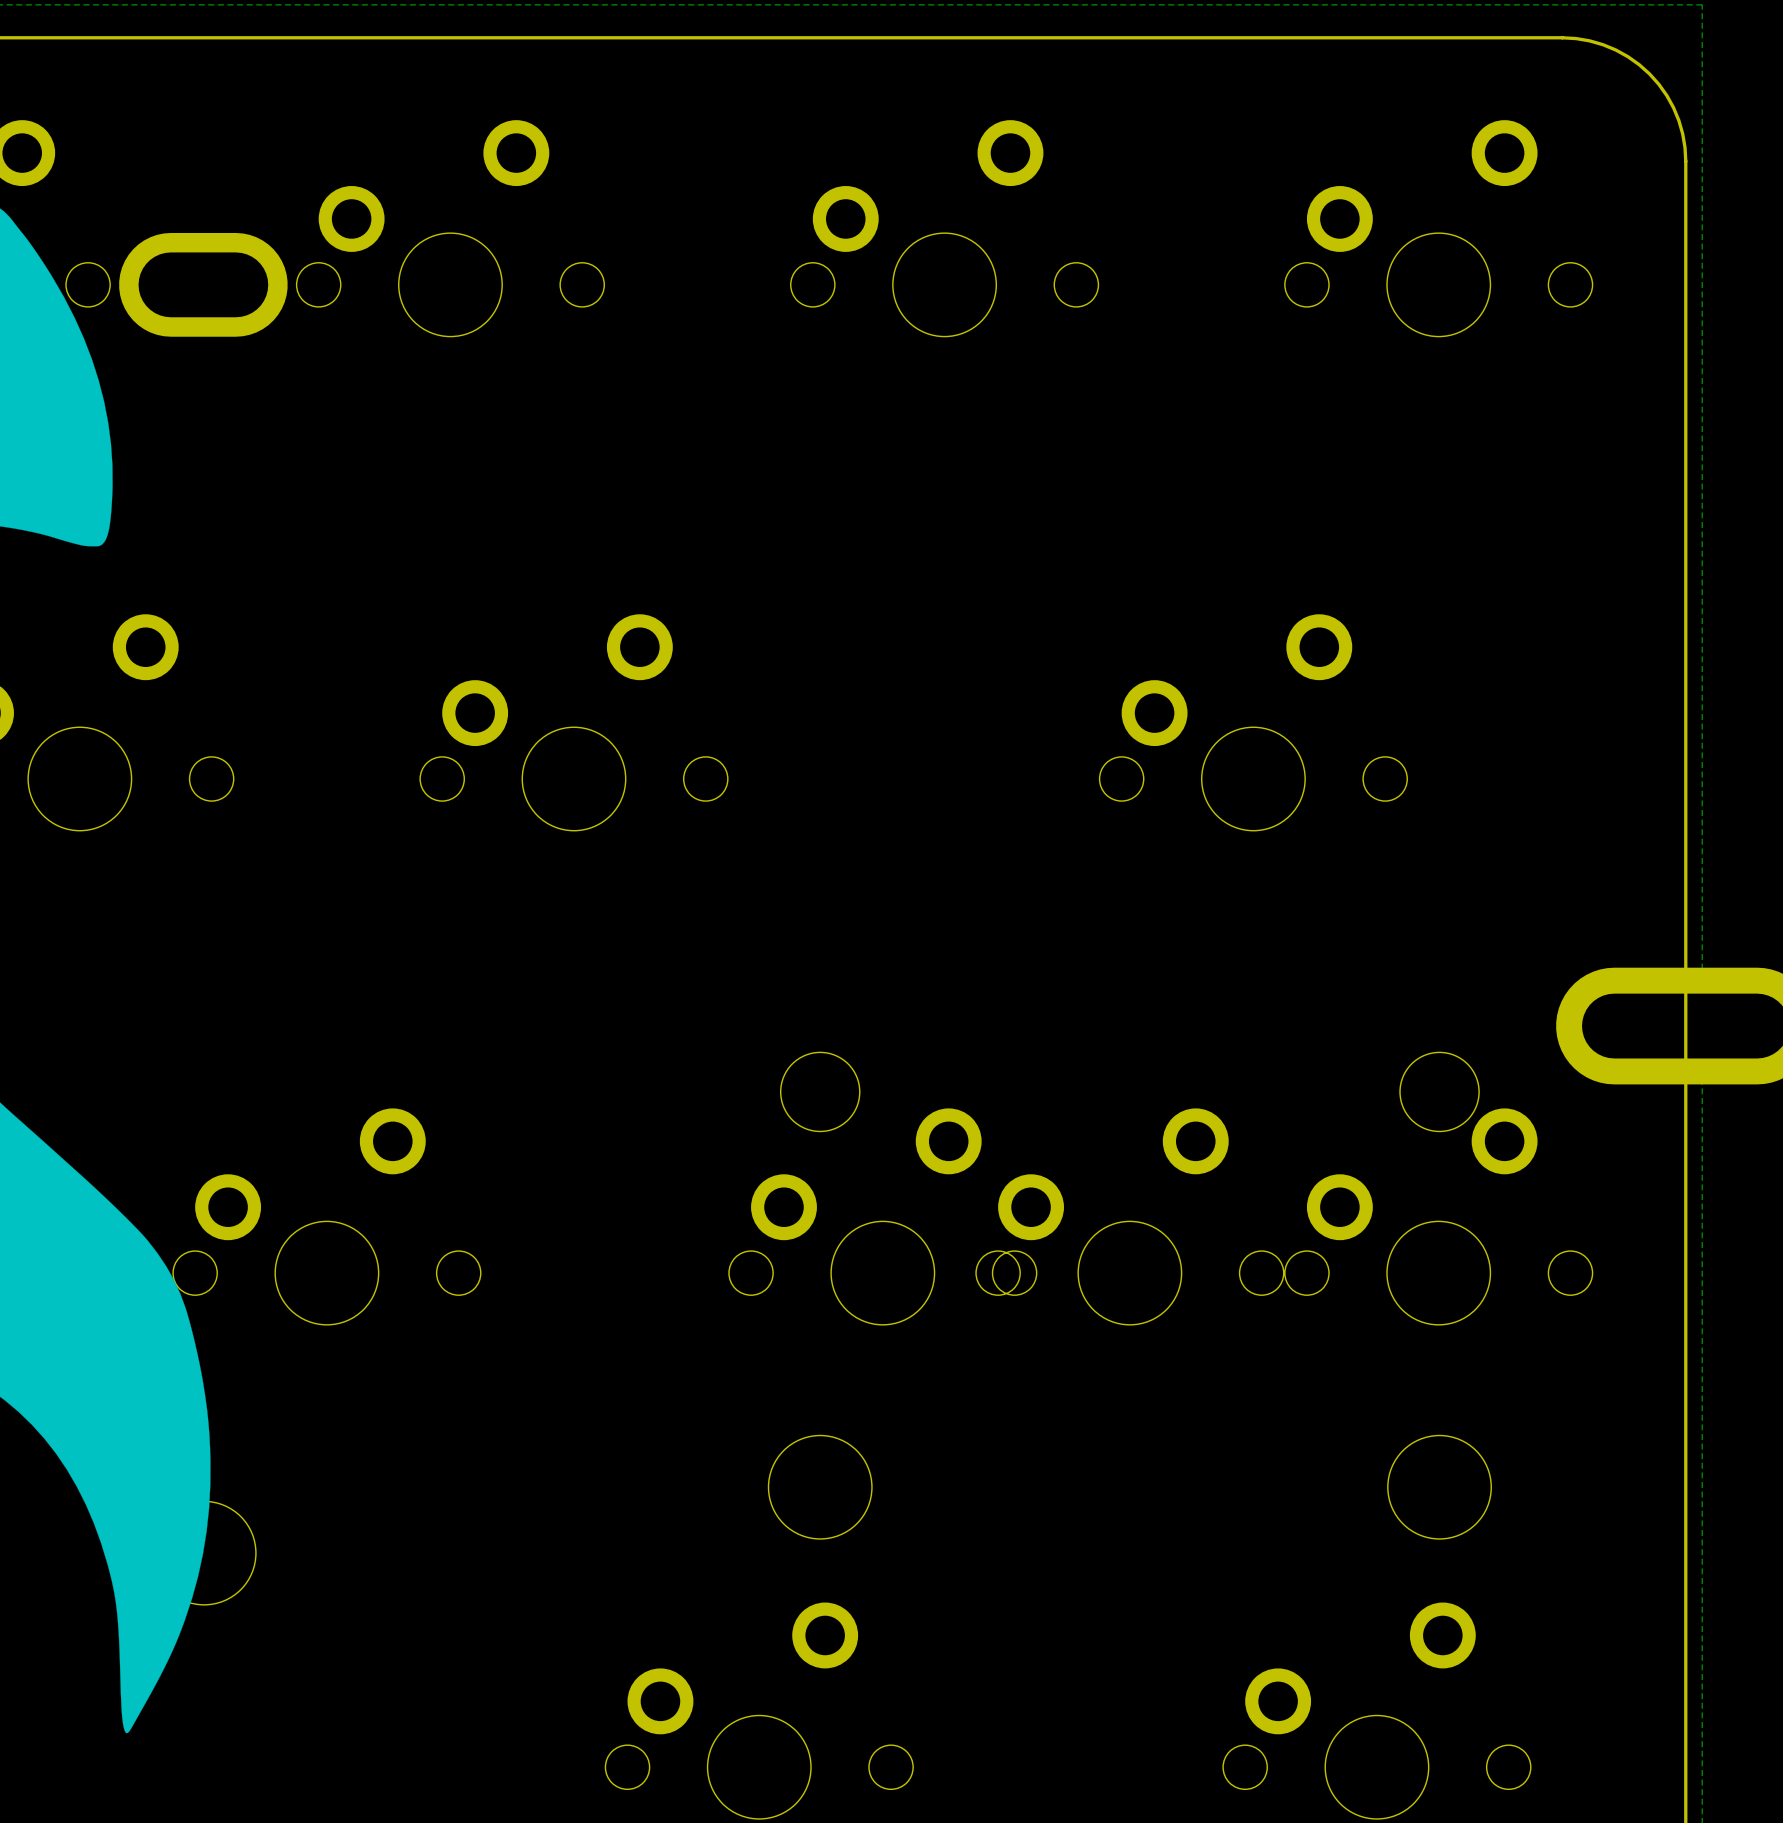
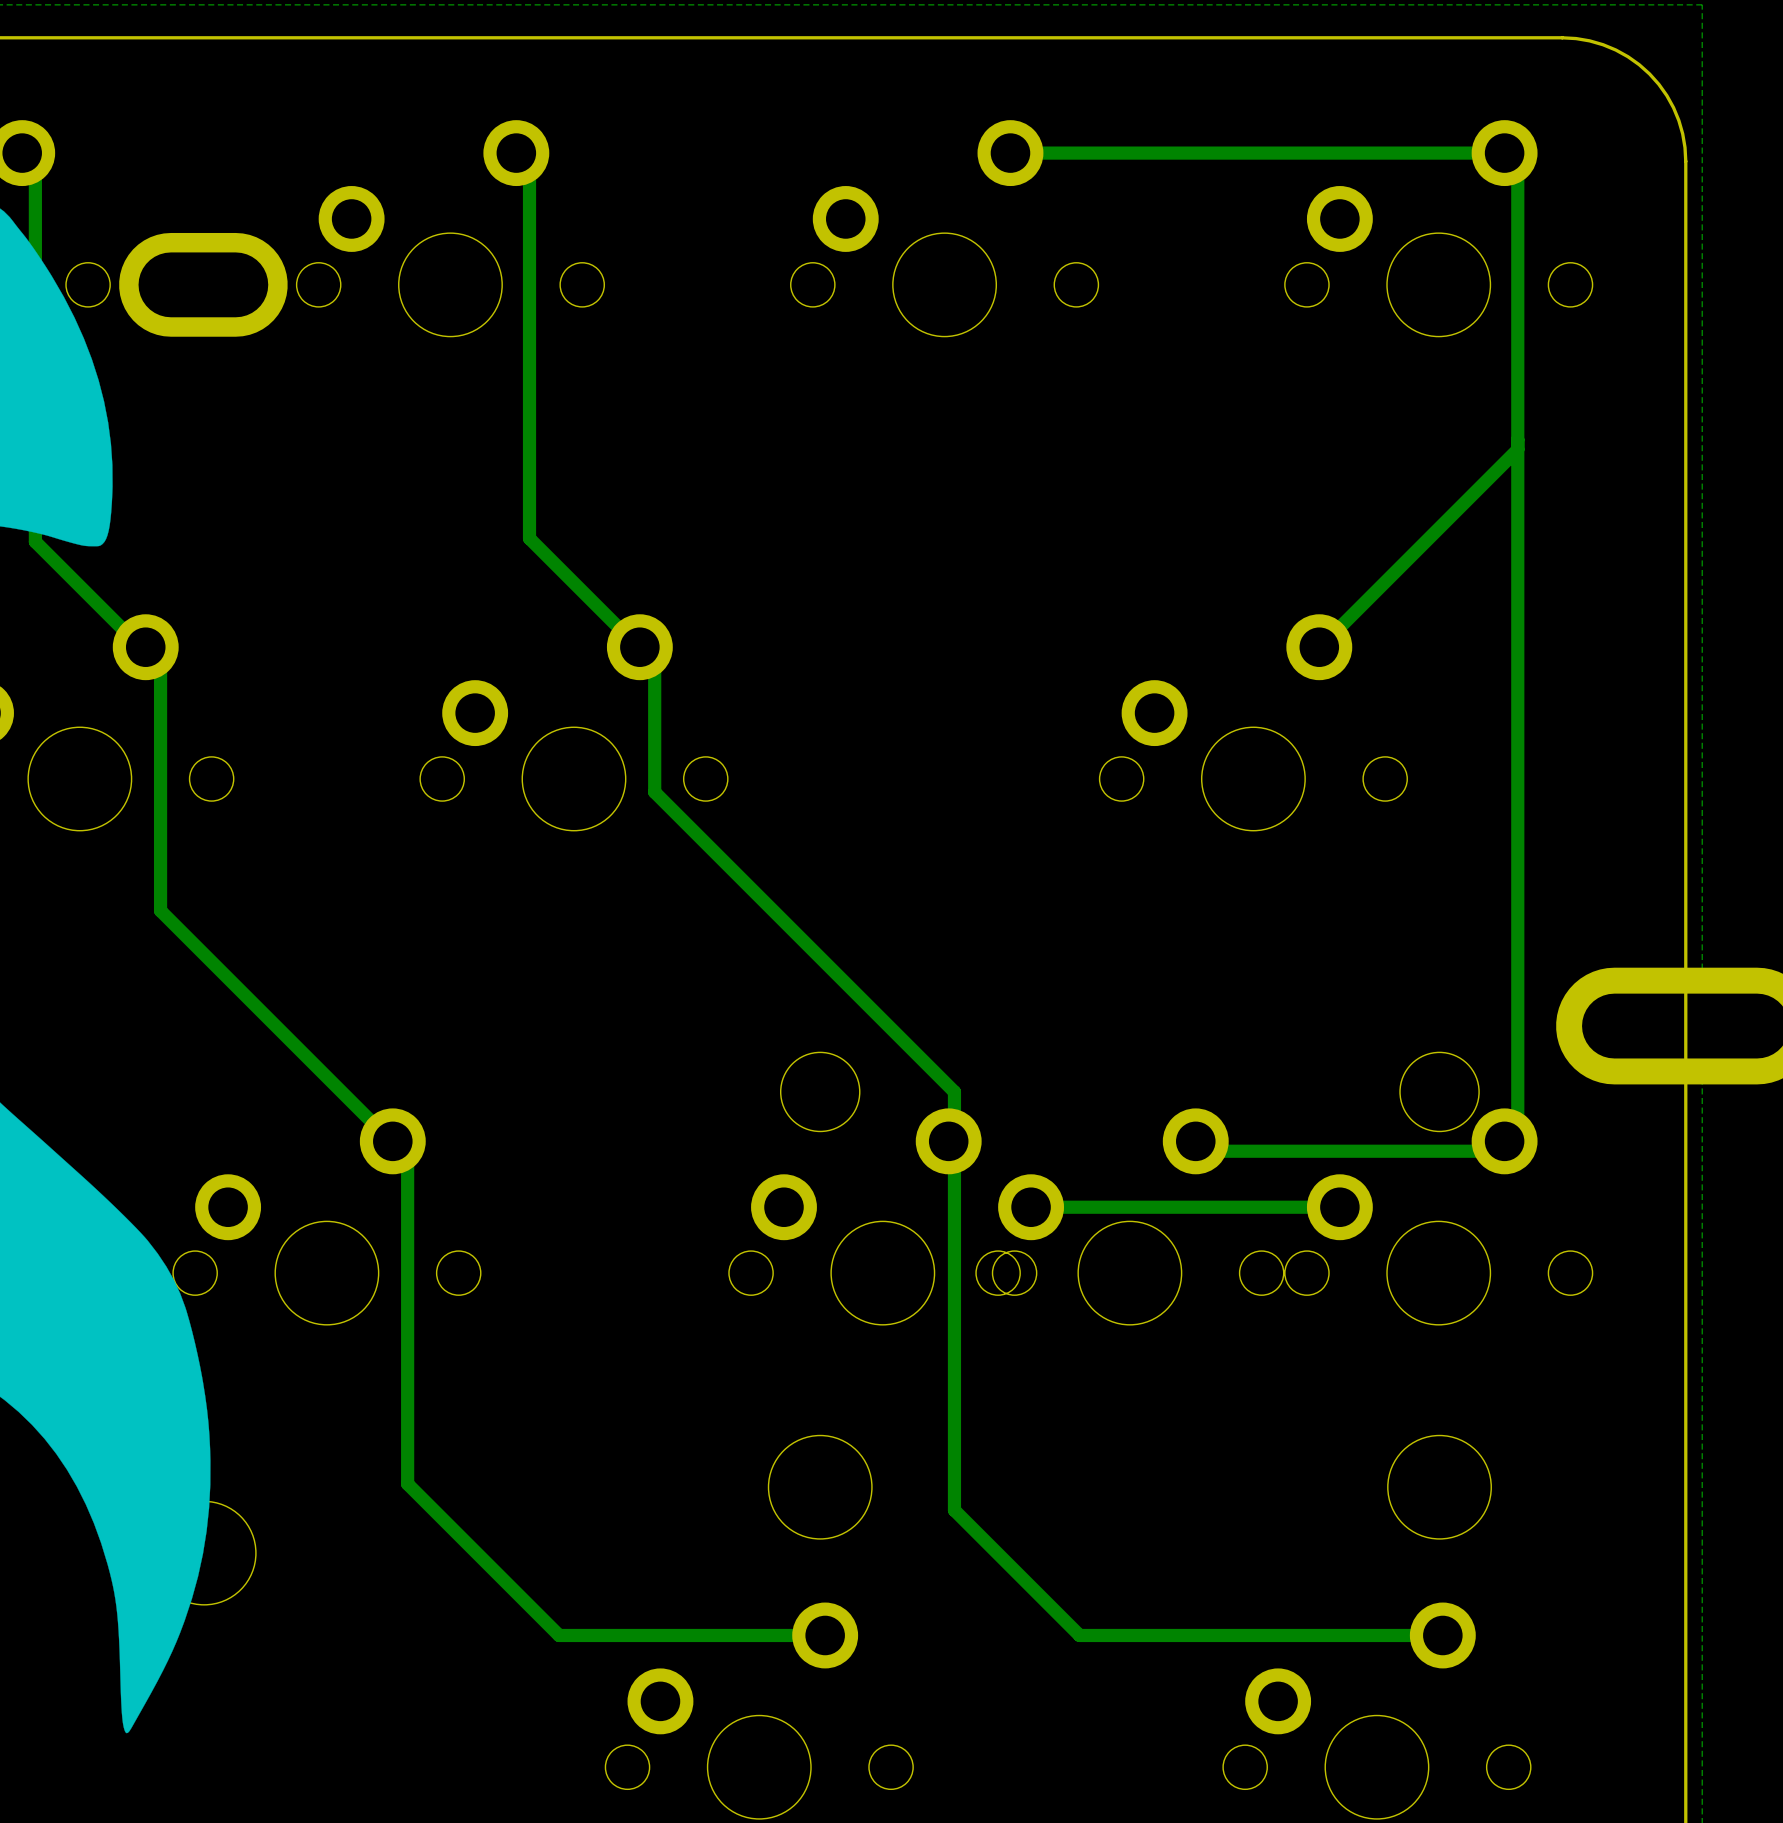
track: none -> (22, 153) (22, 162) (35, 176) (35, 541) (160, 666) (160, 910) (394, 1144)
track: none -> (516, 153) (516, 159) (529, 172) (529, 538) (654, 663) (654, 792) (954, 1091) (954, 1510) (1079, 1635) (1442, 1635)
track: none -> (1010, 153) (1501, 153) (1517, 169) (1517, 1124) (1491, 1151) (1204, 1151)
track: none -> (1517, 449) (1320, 647)
track: none -> (392, 1141) (392, 1146) (407, 1161) (407, 1483) (559, 1635) (825, 1635)
track: none -> (1339, 1207) (1026, 1207)

